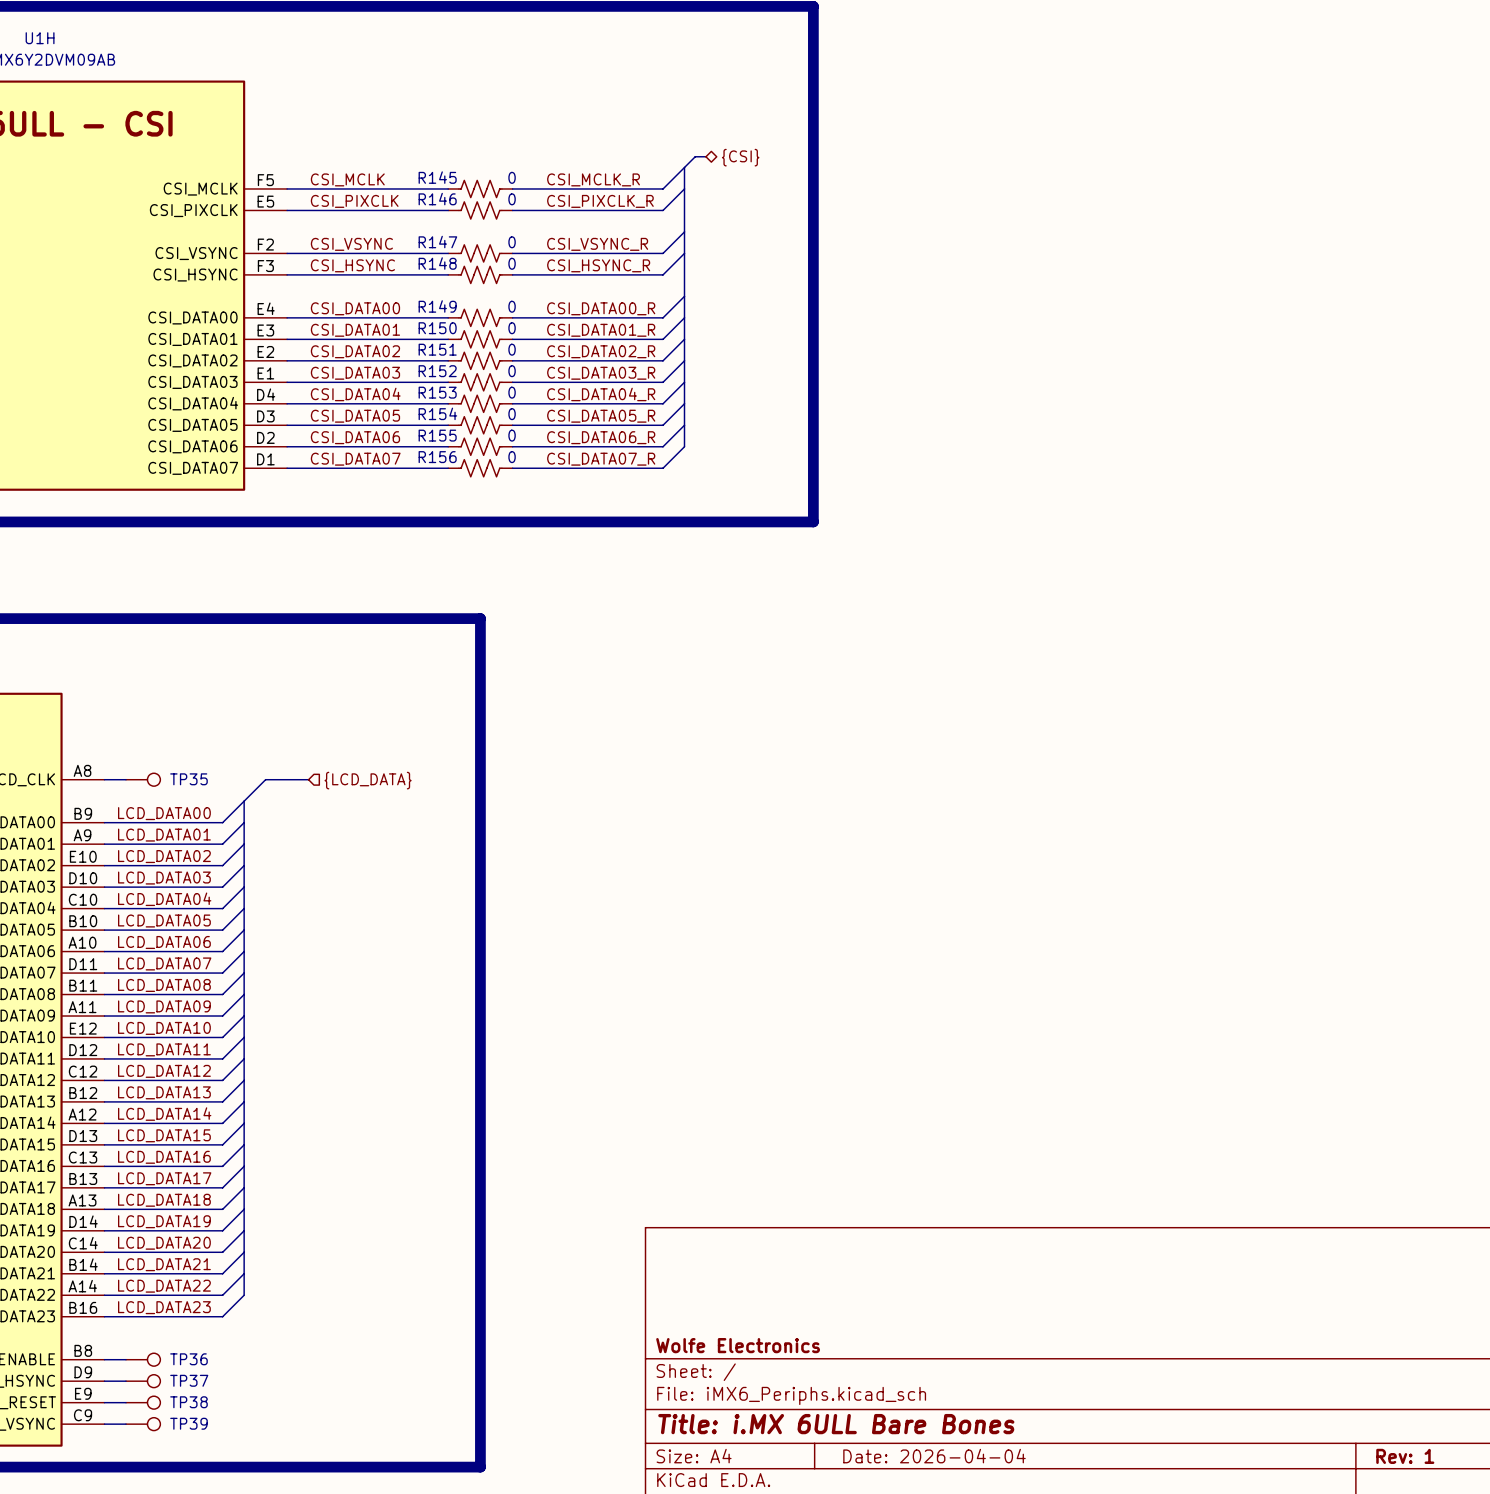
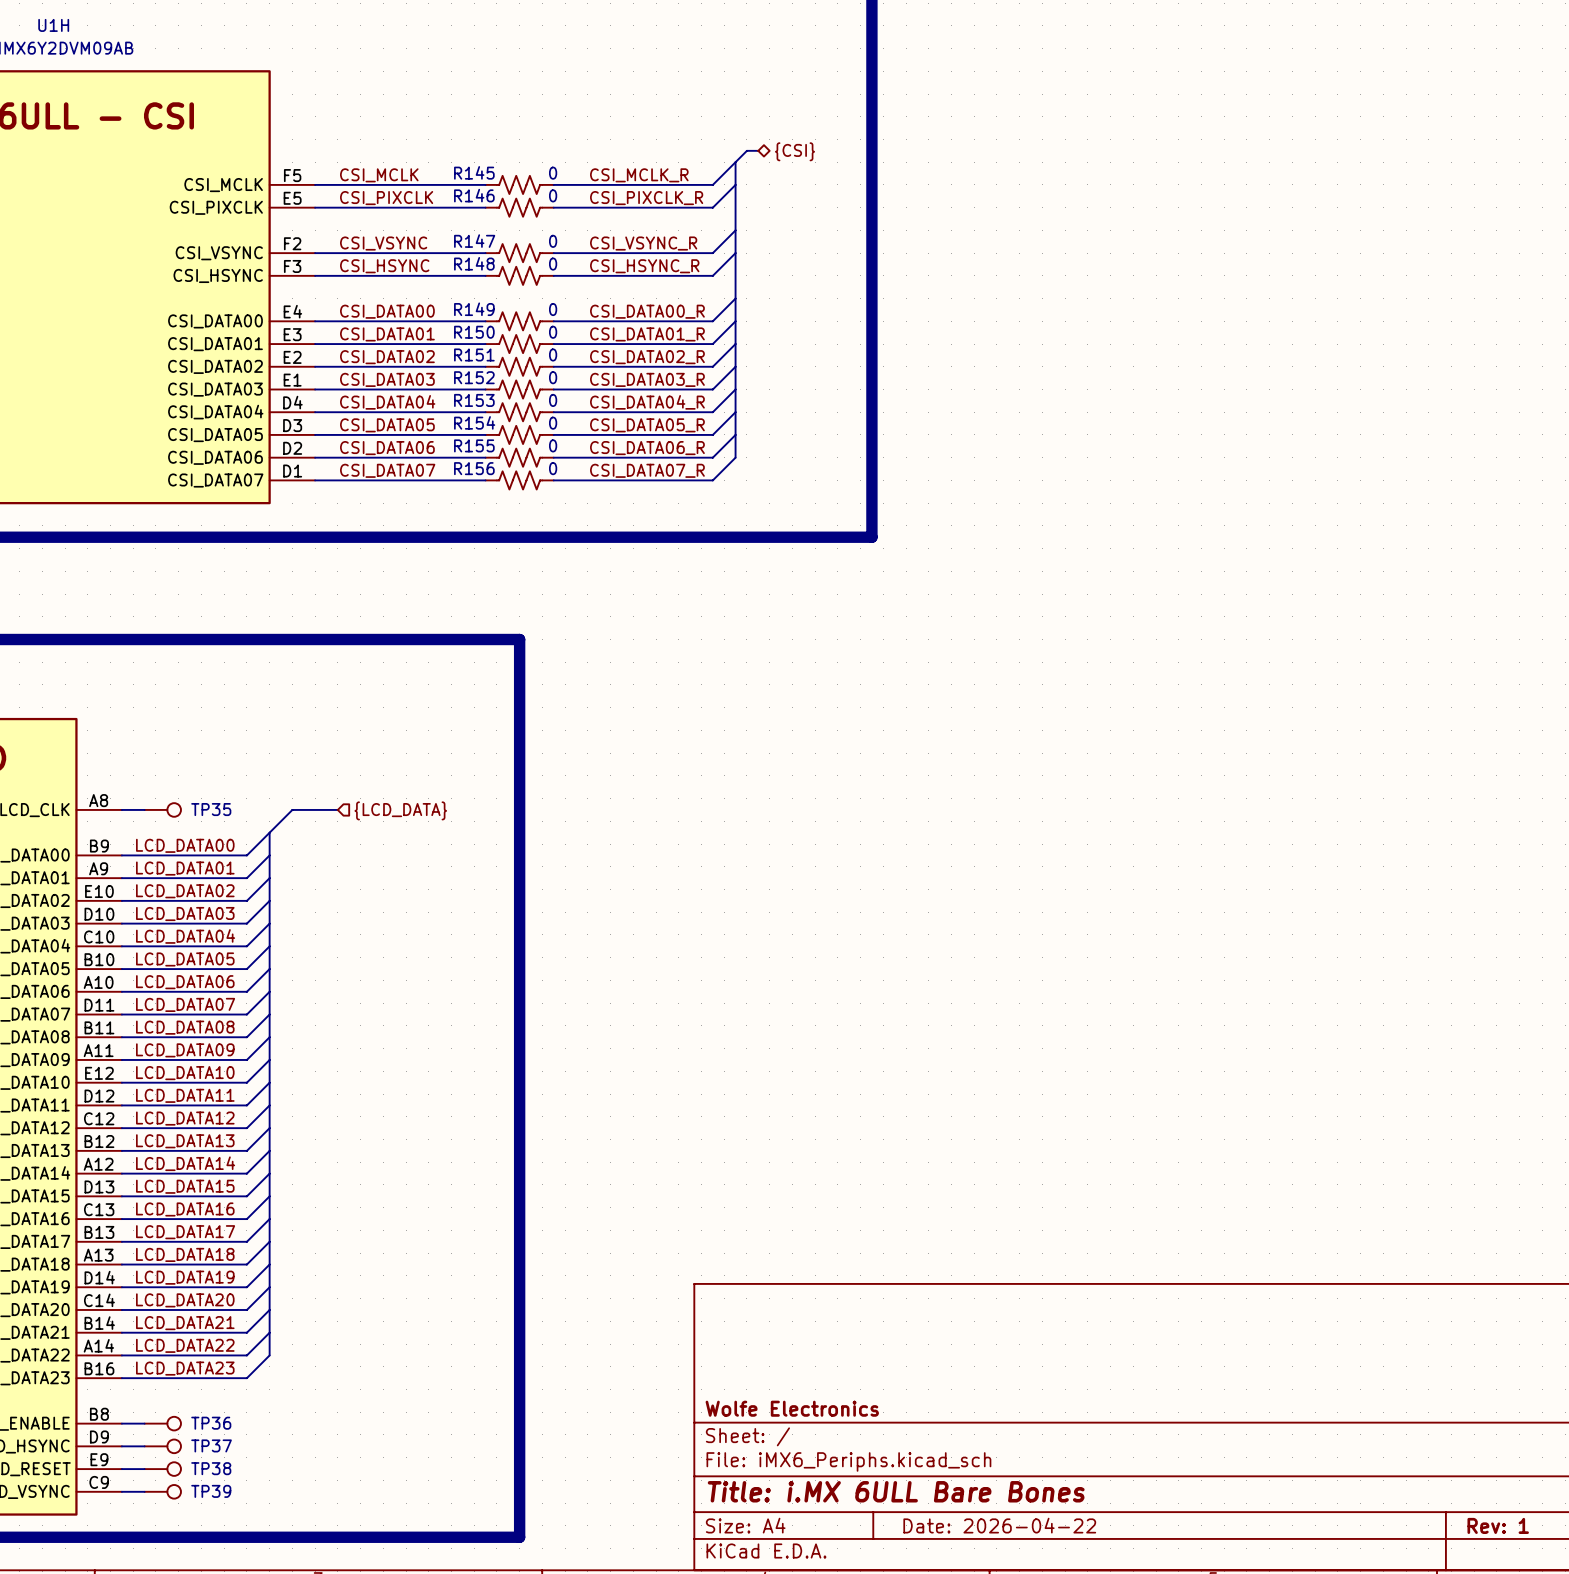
title block: Date: 2026-04-04 (934, 1456) -> Date: 2026-04-22 (999, 1525)

